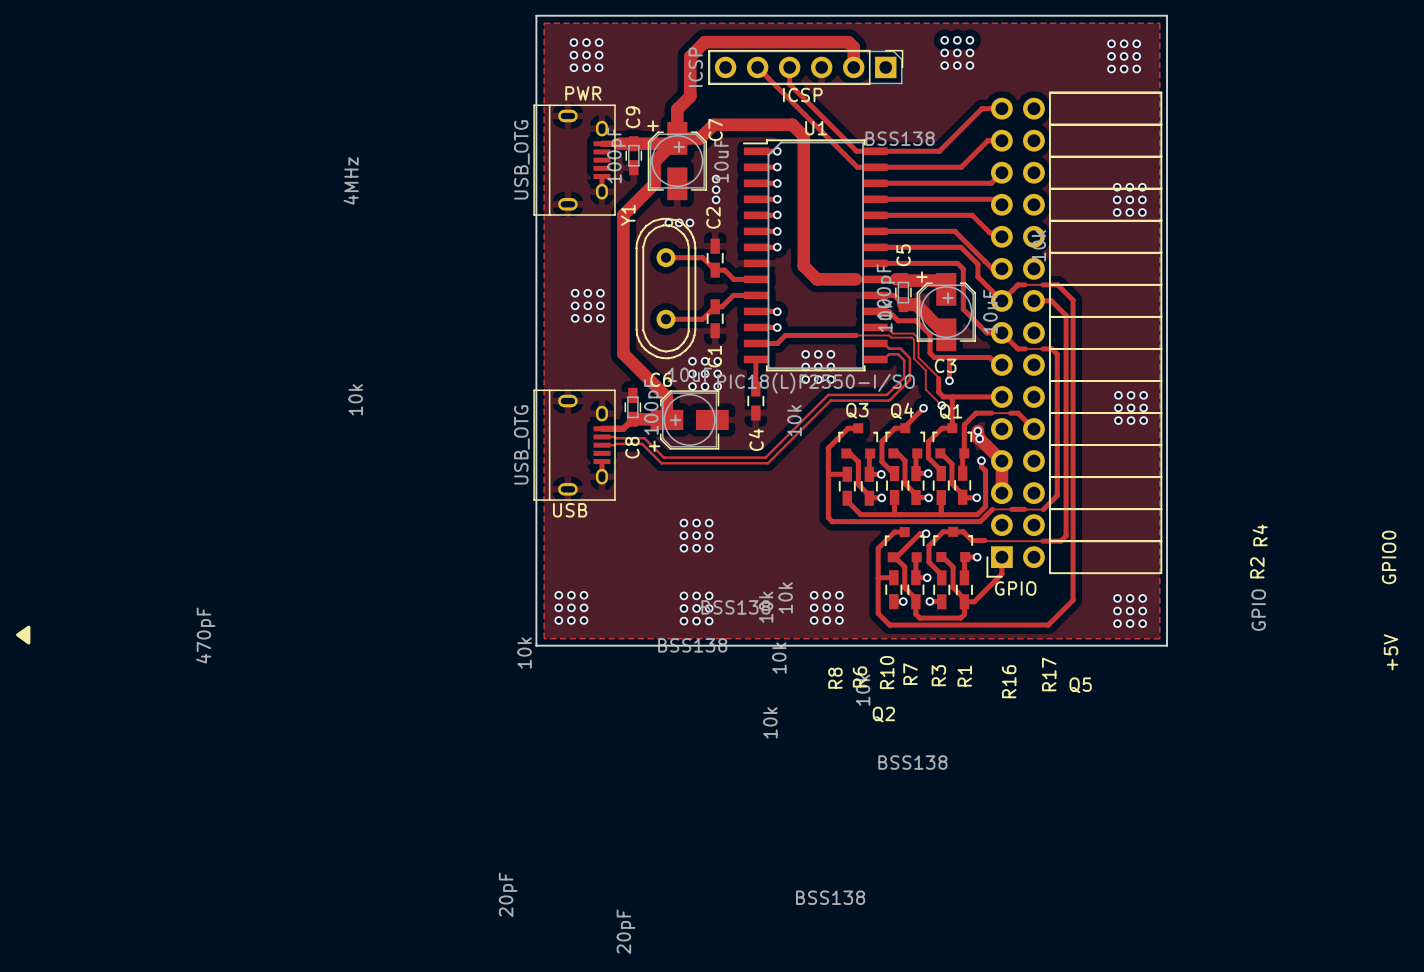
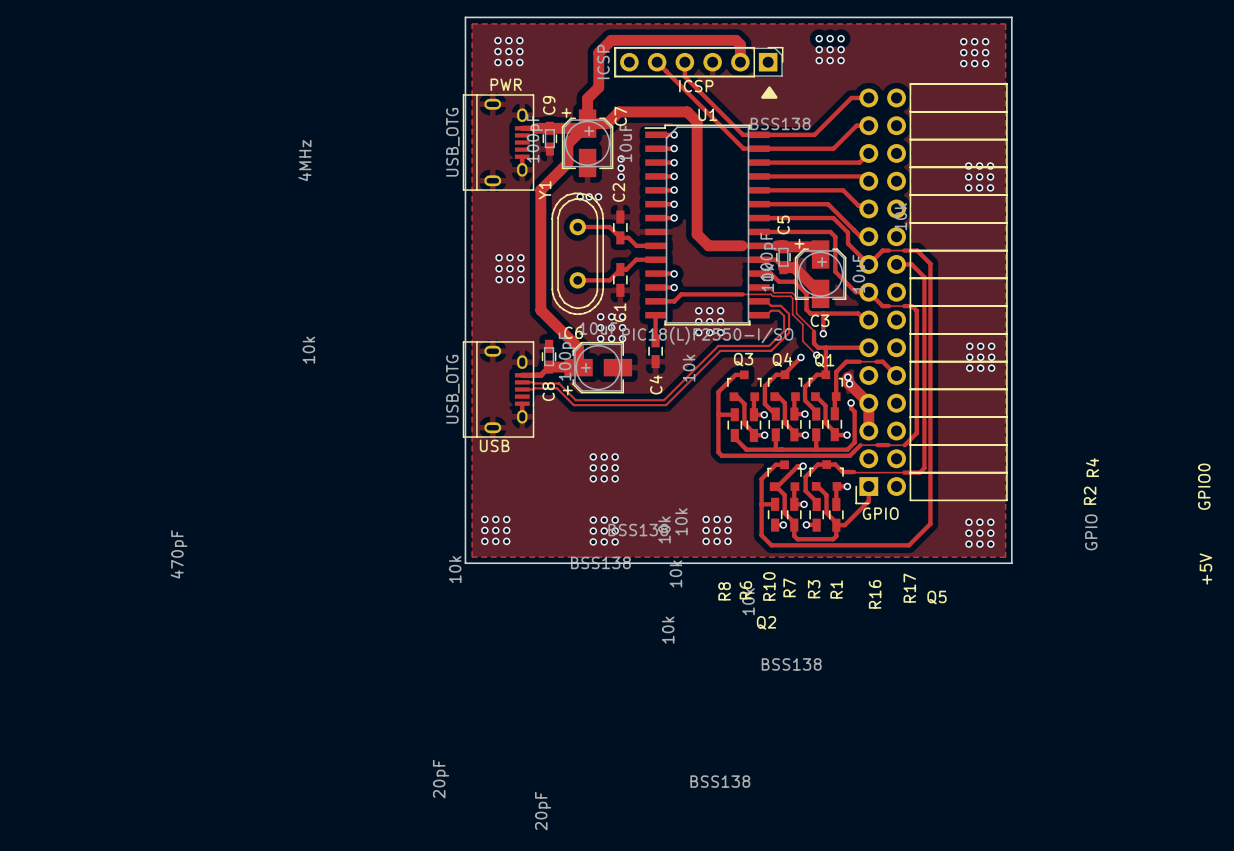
drawing: none -> [761, 86, 778, 99]
drawing: [16, 625, 31, 645] -> none

